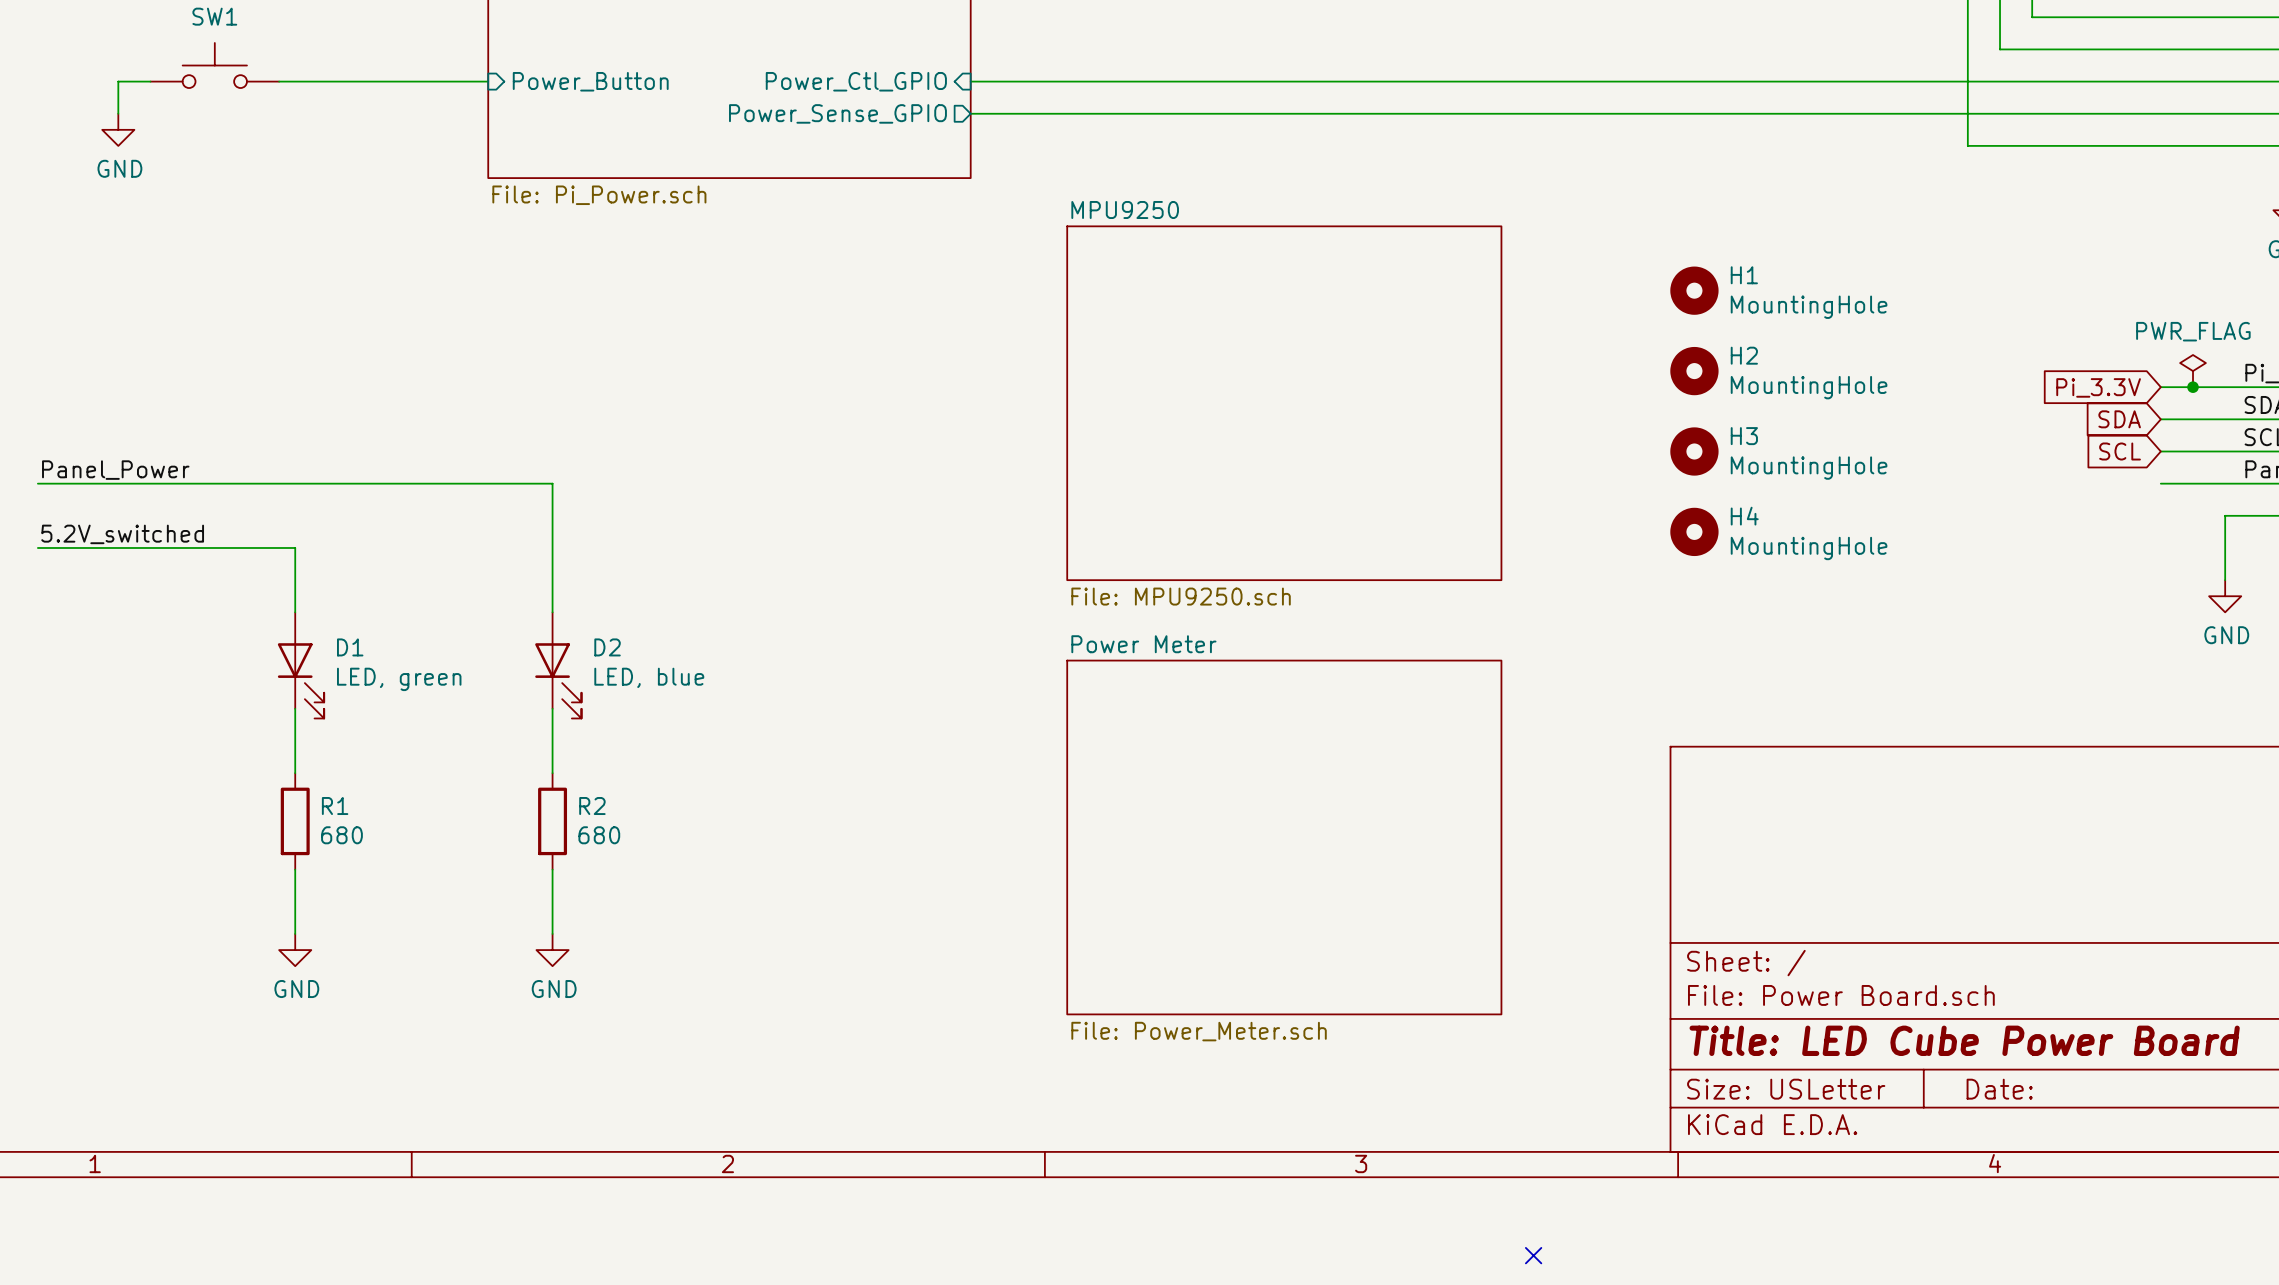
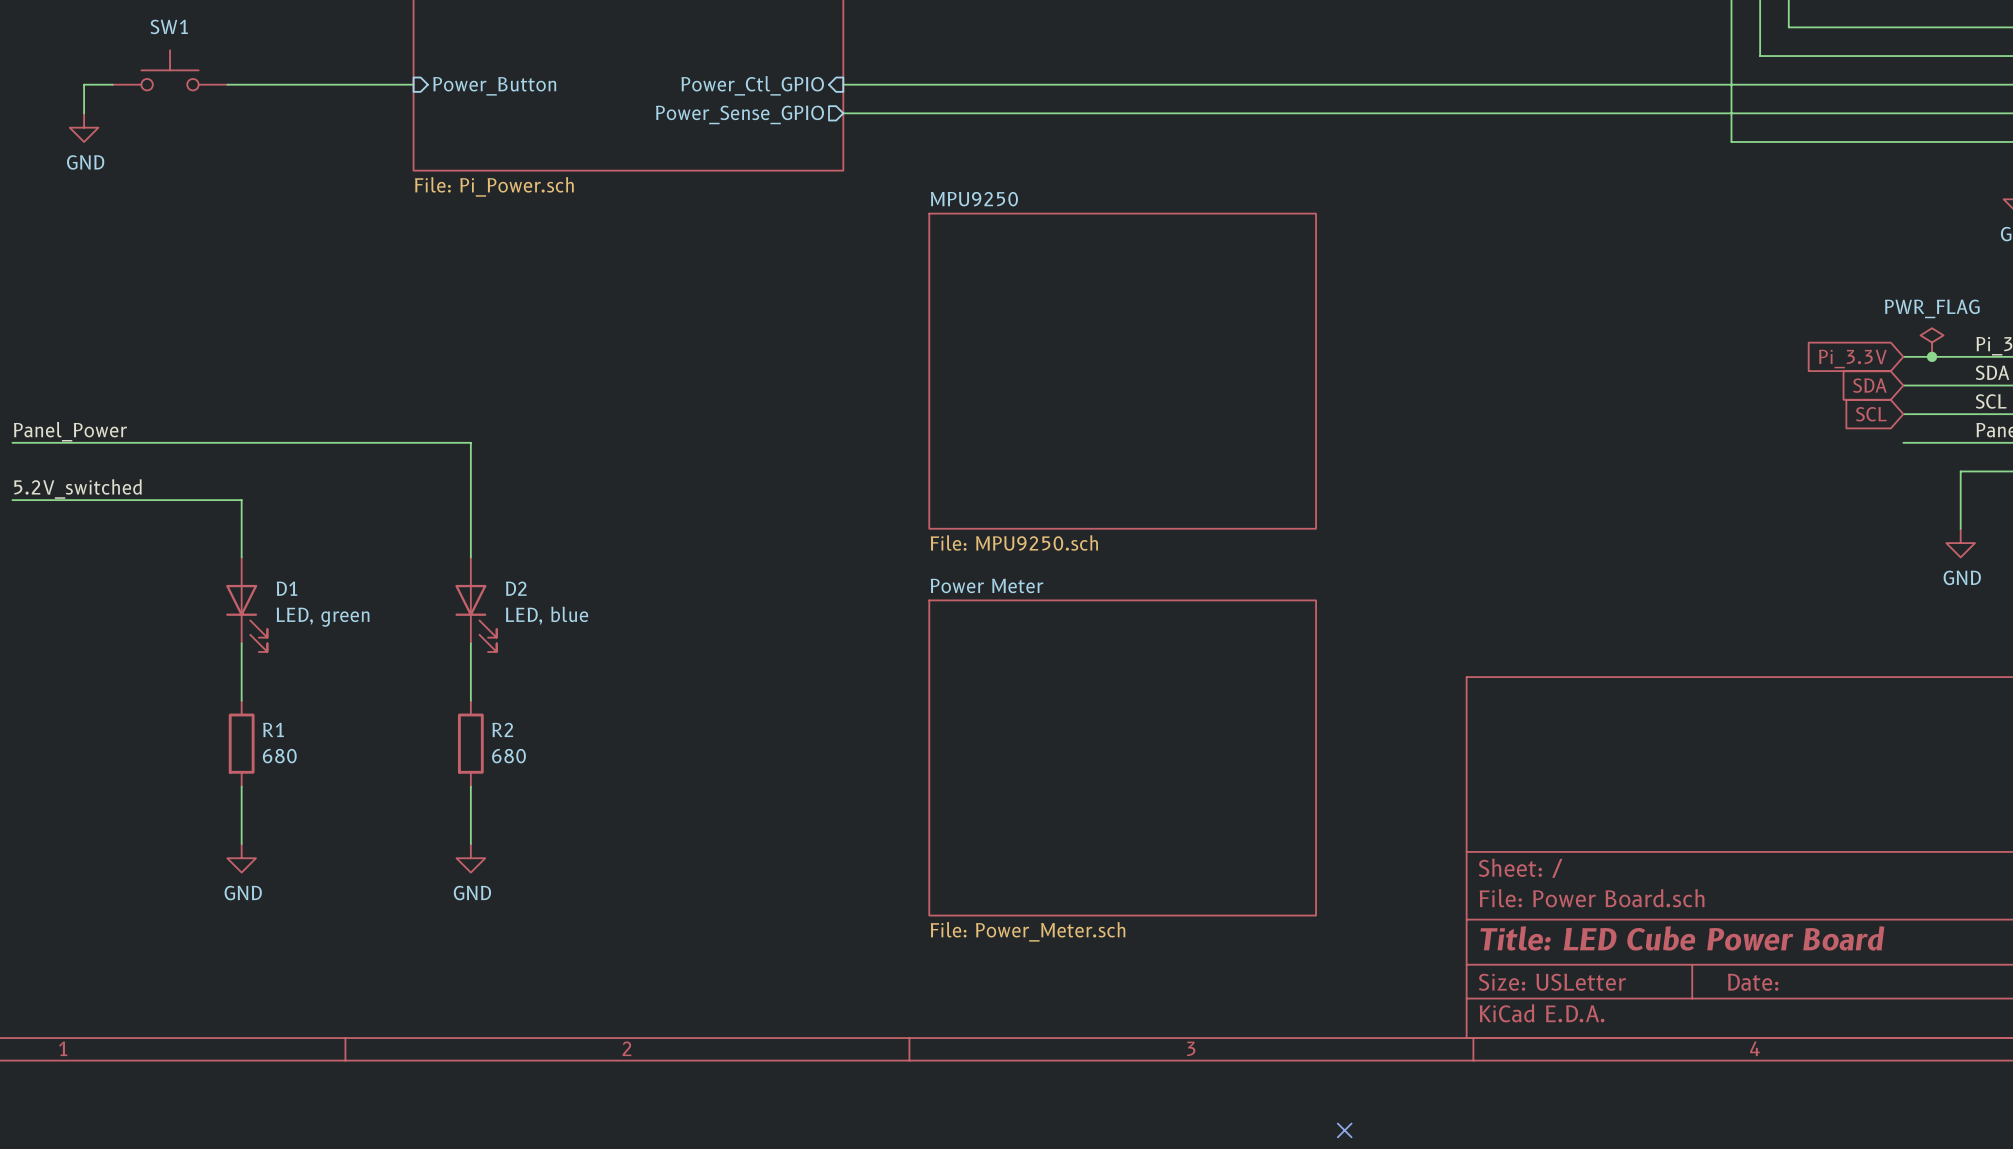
H1: MountingHole (1694, 290) -> none
H2: MountingHole (1694, 371) -> none
H3: MountingHole (1694, 451) -> none
H4: MountingHole (1694, 531) -> none

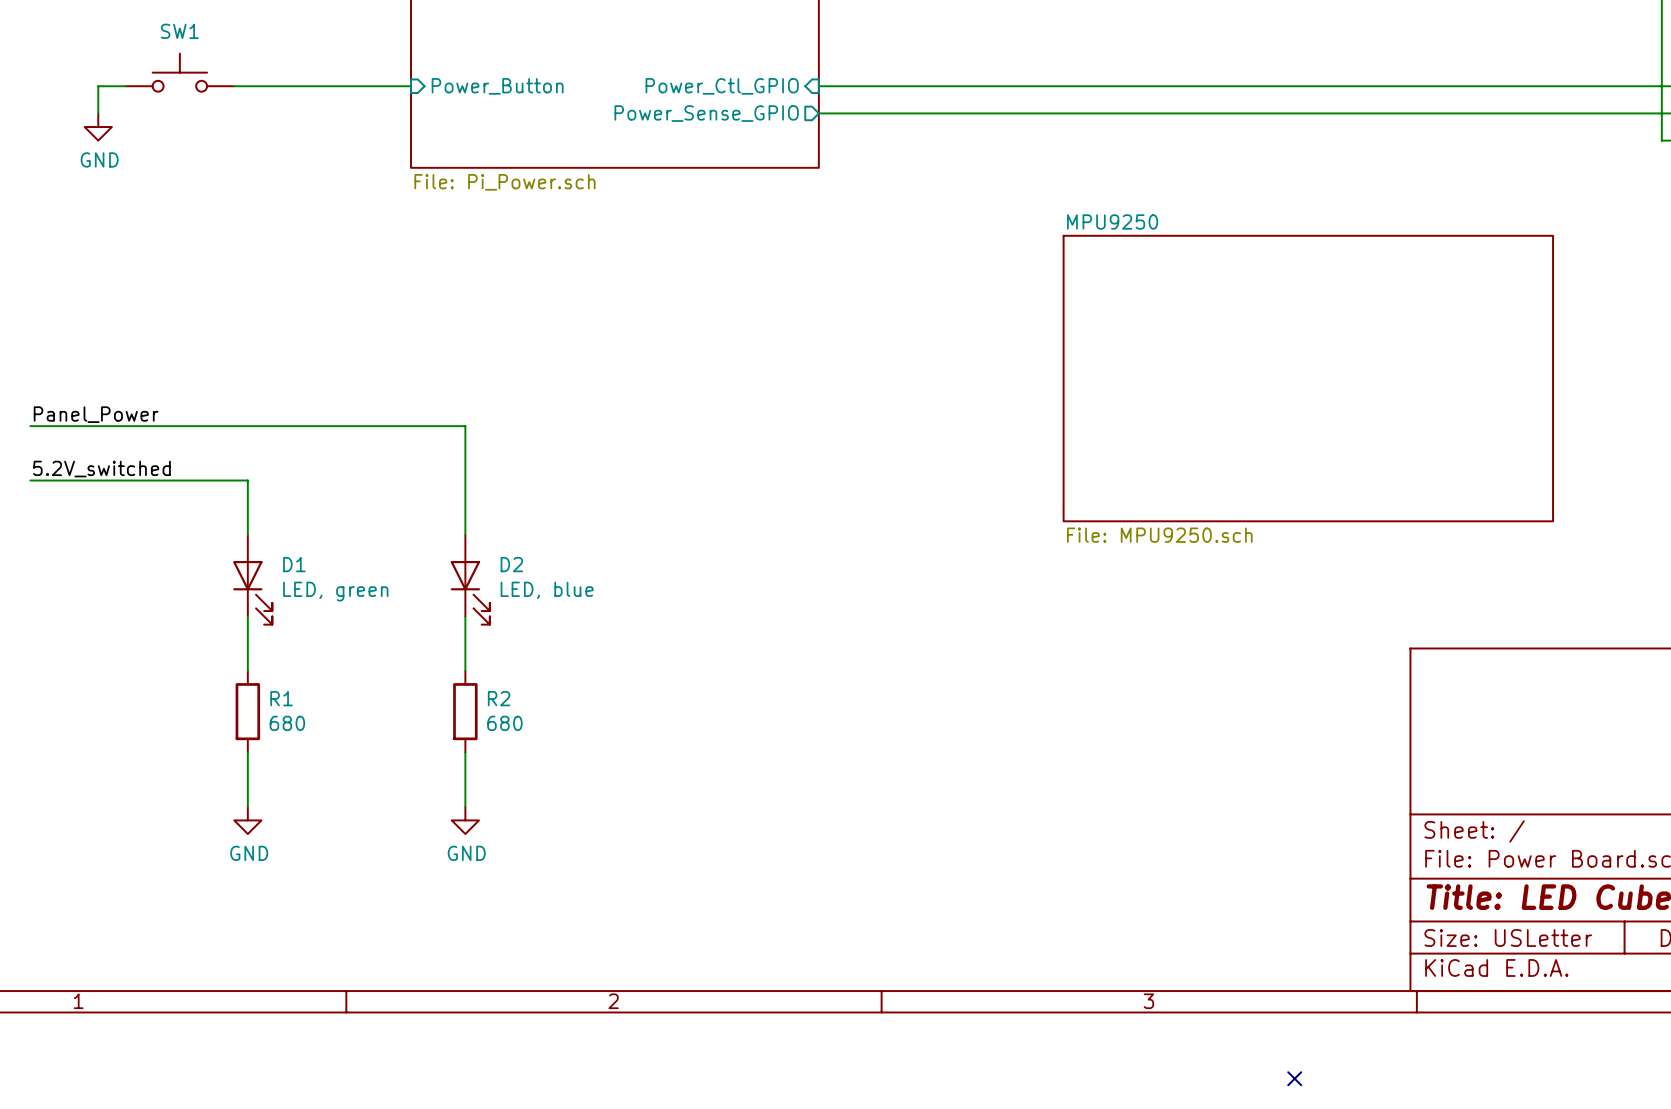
sheet MPU9250 name position: MPU9250 (974, 199) -> MPU9250 (1112, 221)
sheet MPU9250 shape: [929, 213, 1317, 529] -> [1063, 235, 1554, 522]
sheet MPU9250 value position: File: MPU9250.sch (1014, 542) -> File: MPU9250.sch (1159, 535)
sheet Power Meter: File: Power_Meter.sch (1122, 757) -> none

